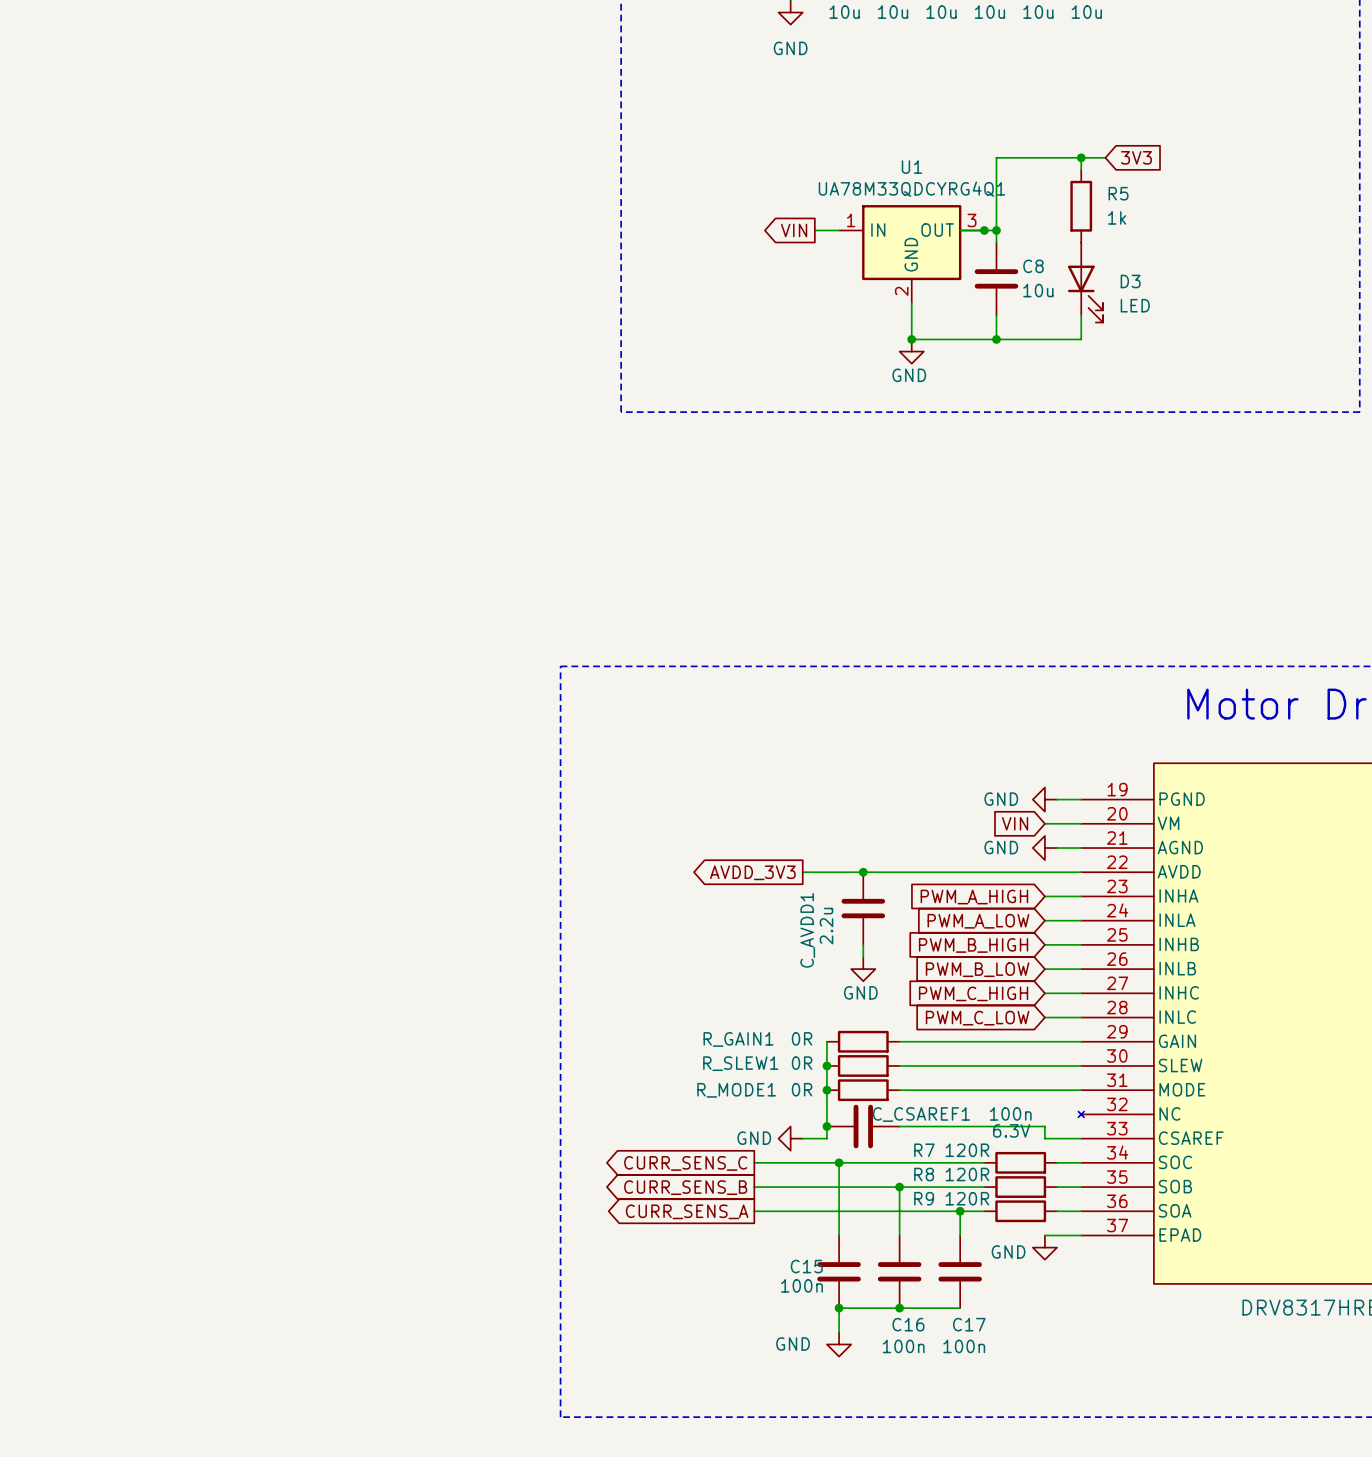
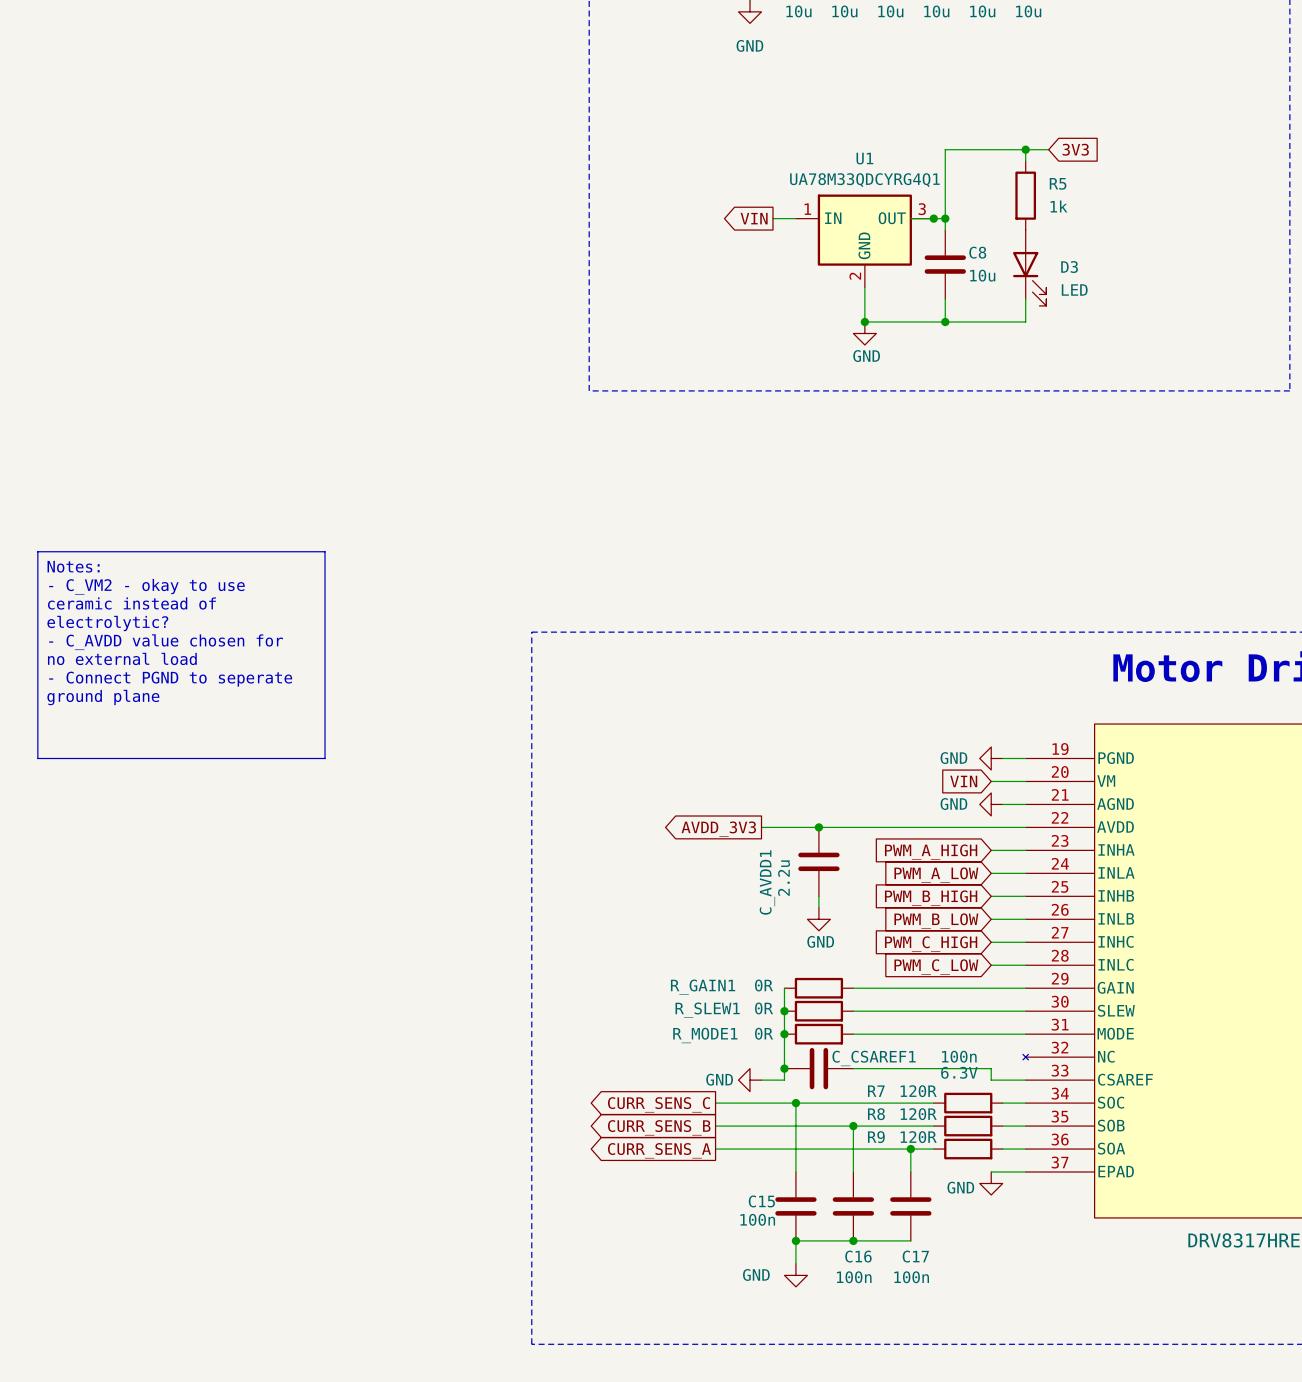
line: none -> (37, 551) (325, 551) (325, 758) (37, 758) (37, 551)
text: none -> Notes: (73, 566)
text: none -> - C_VM2 - okay to use (146, 586)
text: none -> ceramic instead of (131, 603)
text: none -> electrolytic? (107, 623)
text: none -> - C_AVDD value chosen for (166, 642)
text: none -> no external load (122, 658)
text: none -> - Connect PGND to seperate (170, 679)
text: none -> ground plane (103, 697)

